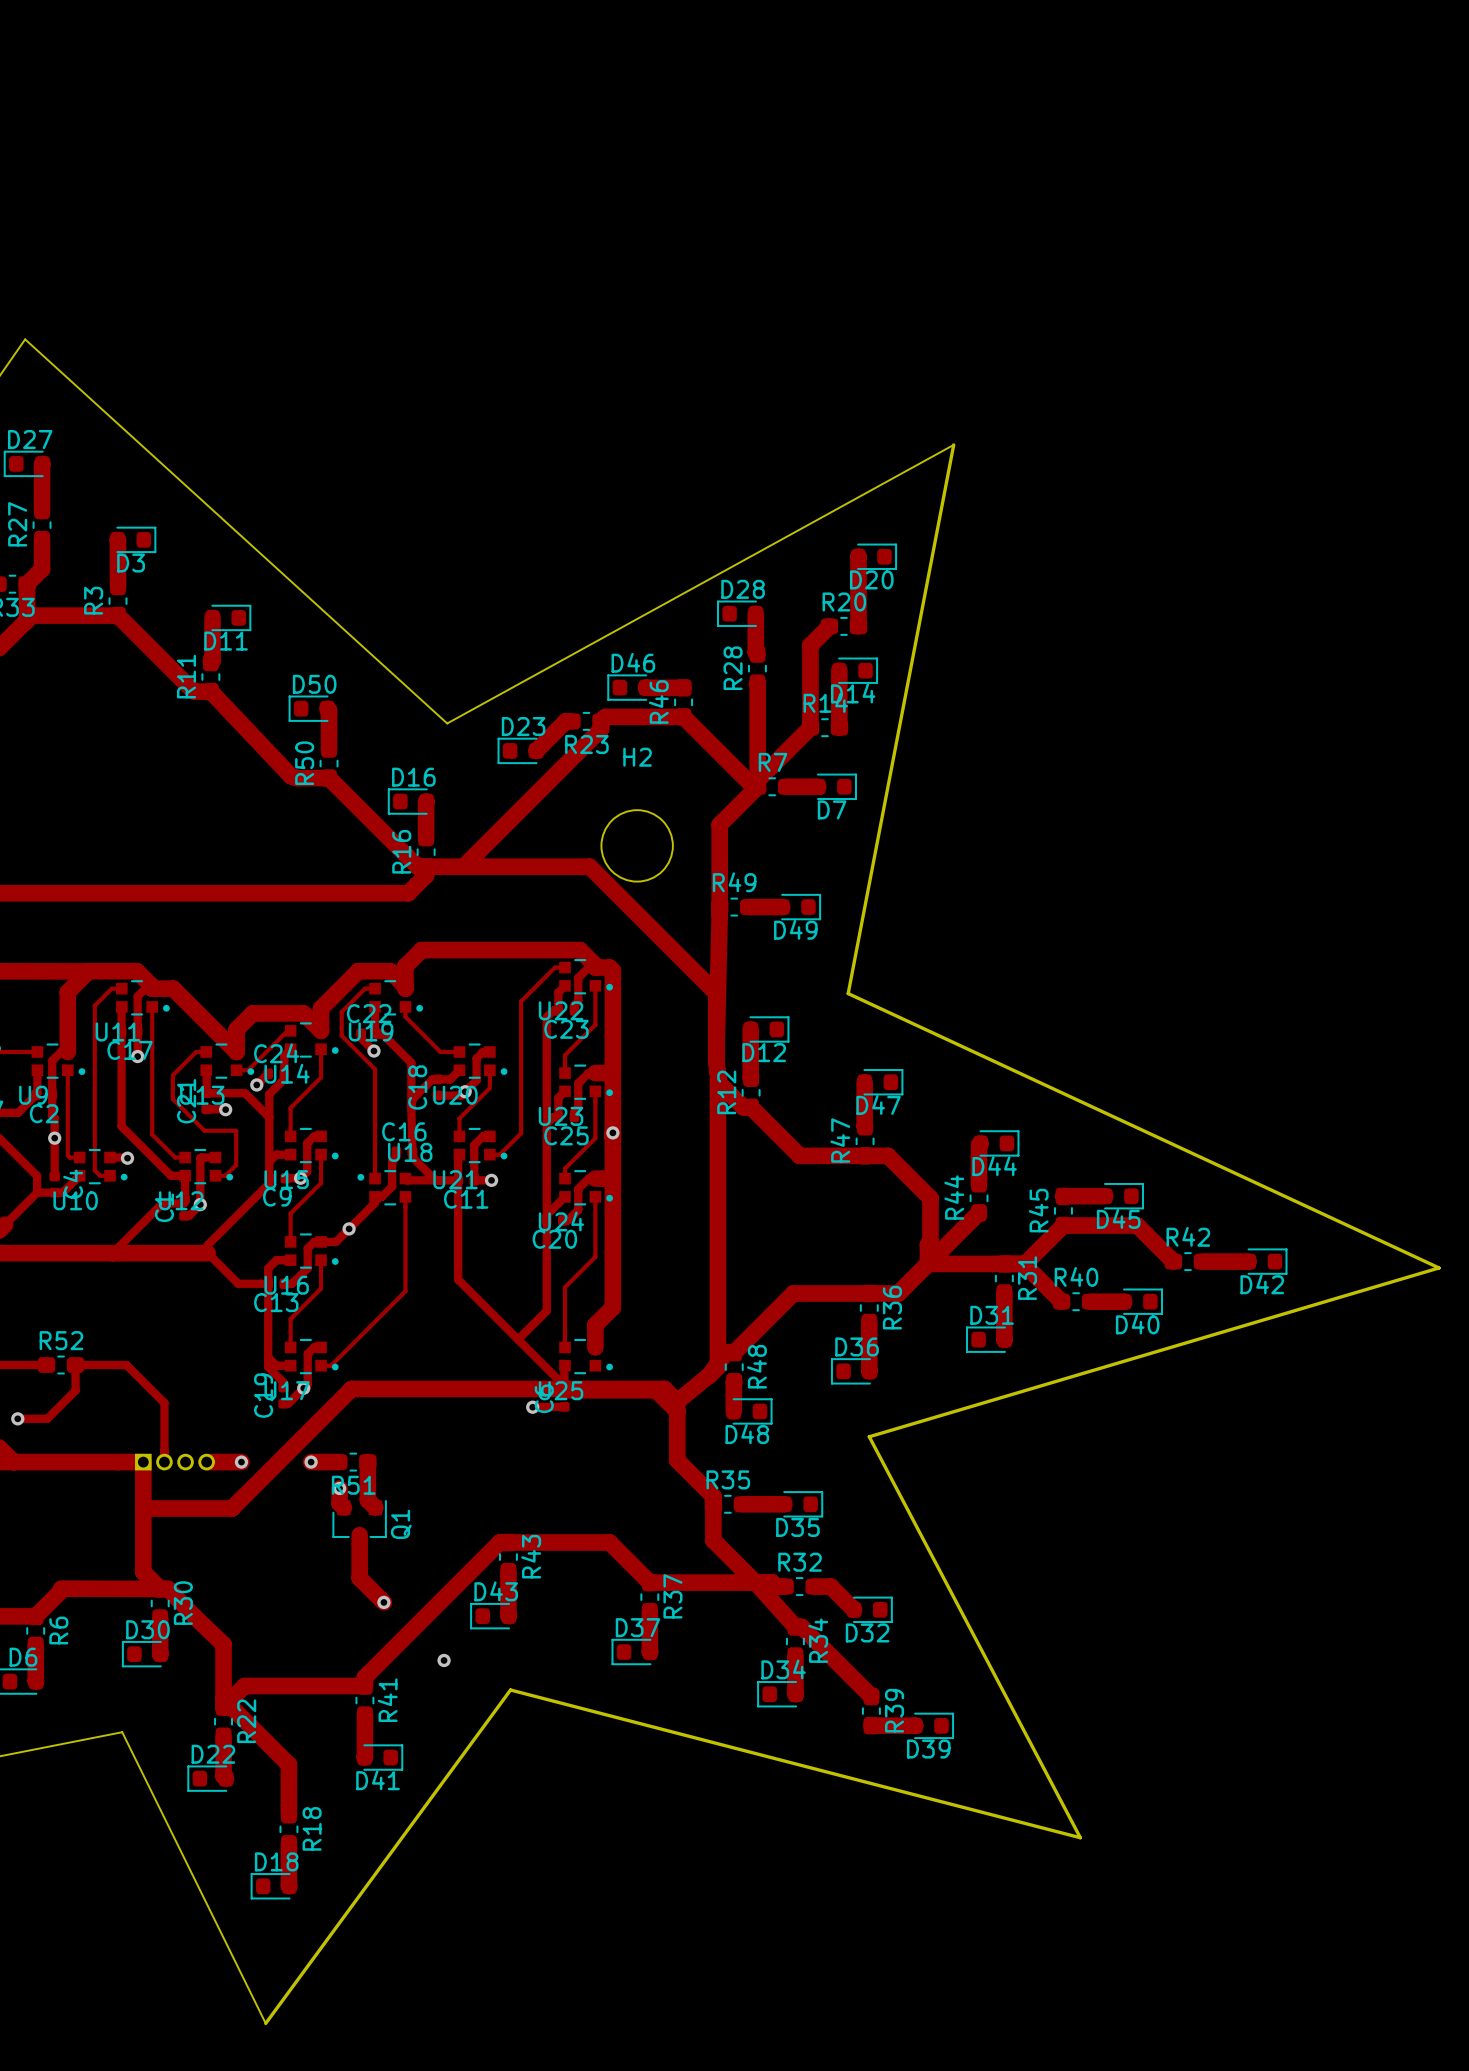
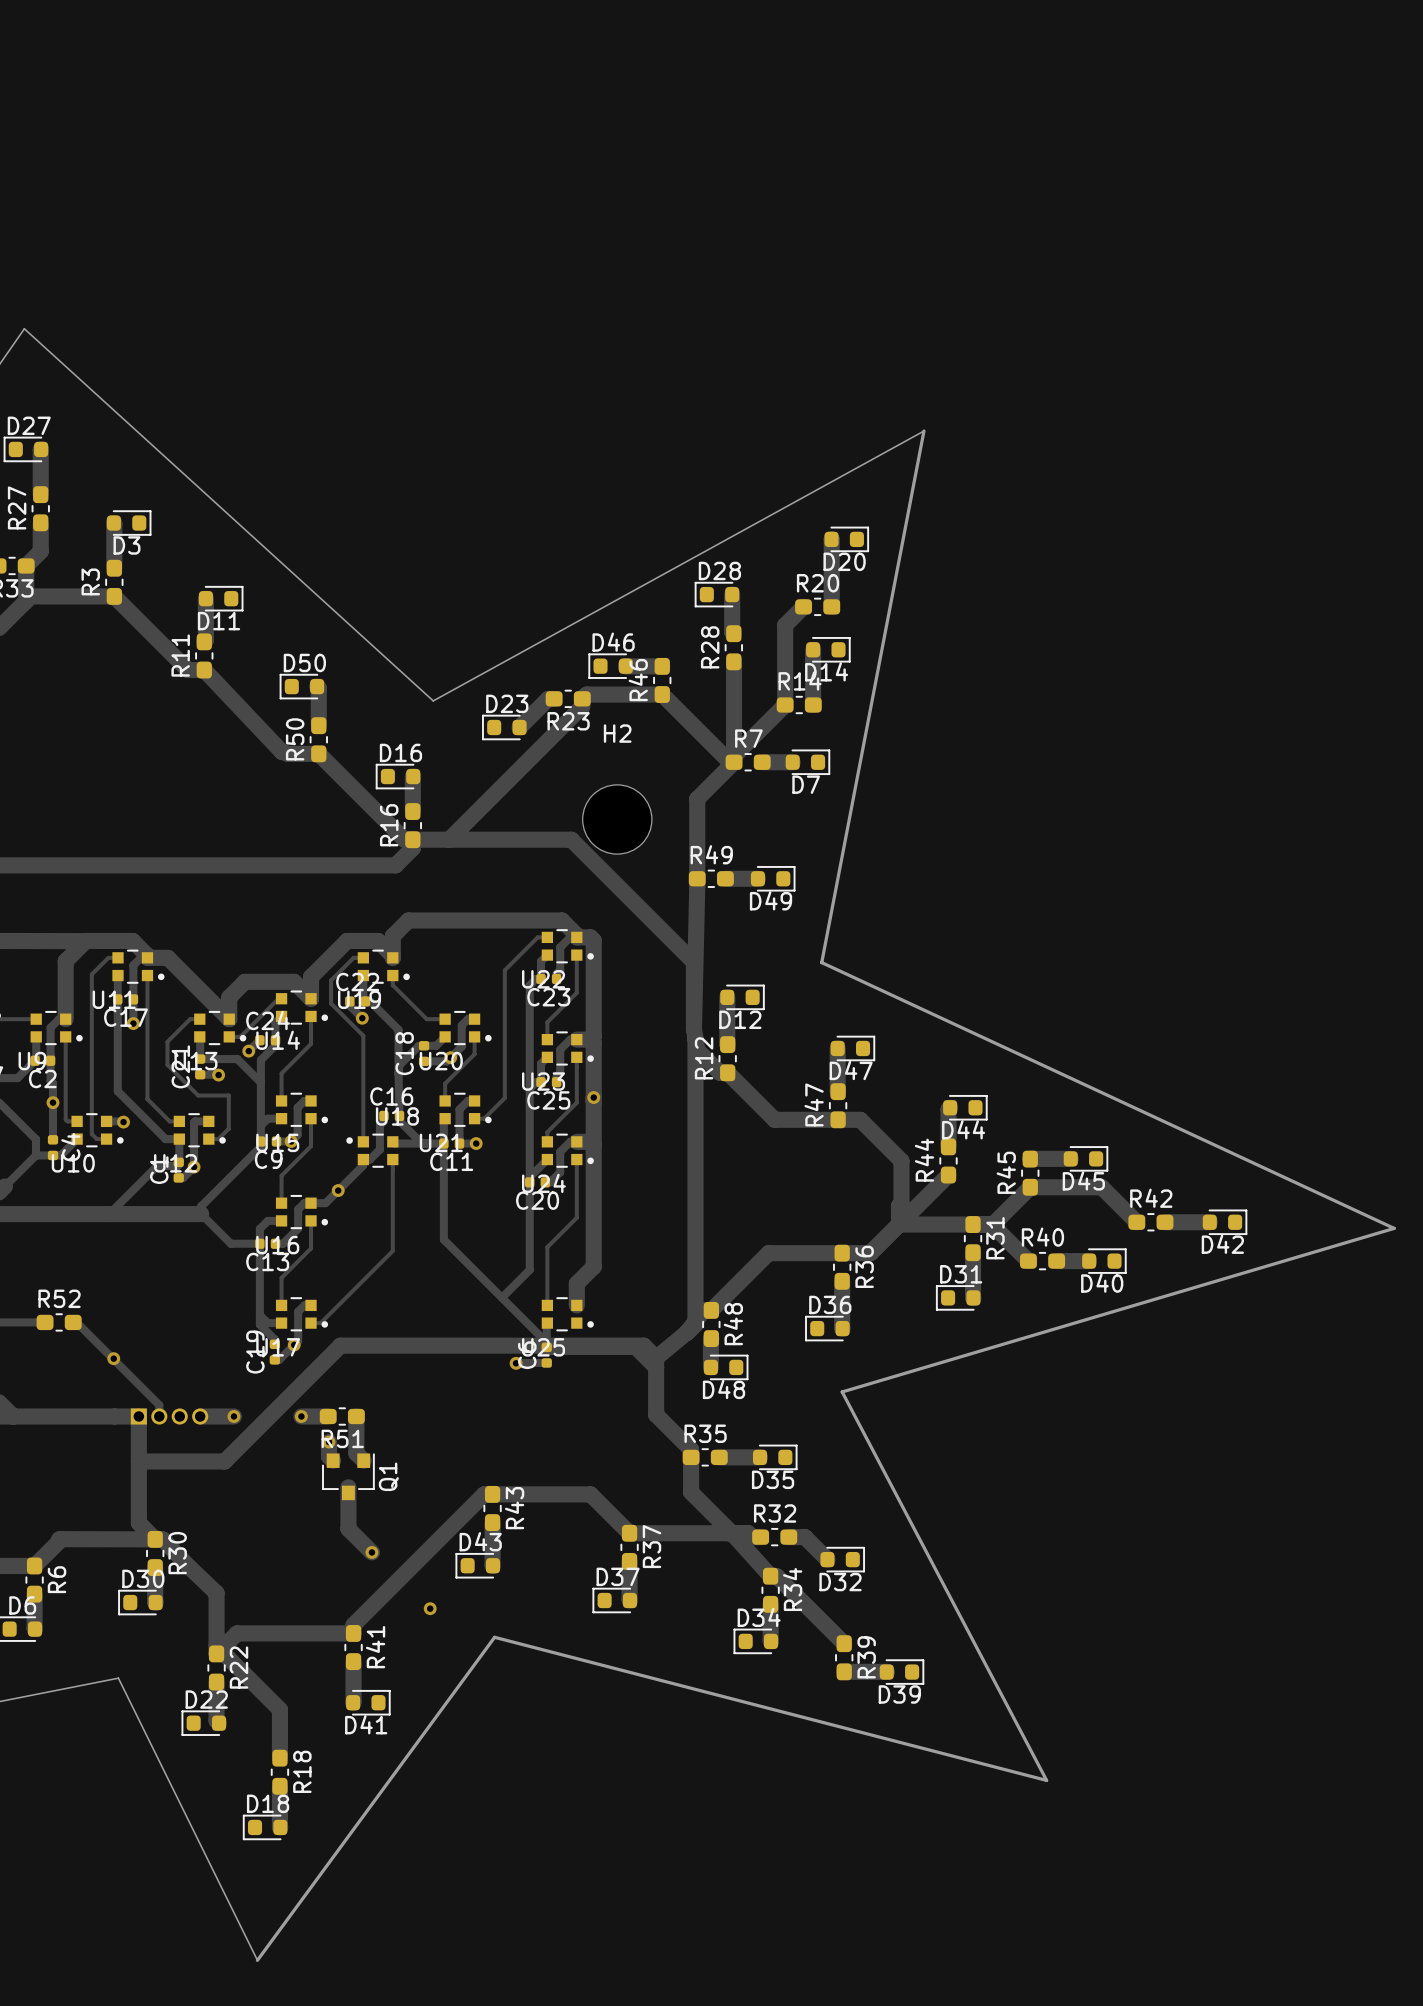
track: (75, 1365) (75, 1390) (47, 1418) (17, 1418) -> none
track: (79, 1365) (126, 1365) (164, 1403) (164, 1450) -> (76, 1322) (159, 1405)
via: none -> (113, 1358)
via: (17, 1418) -> none

